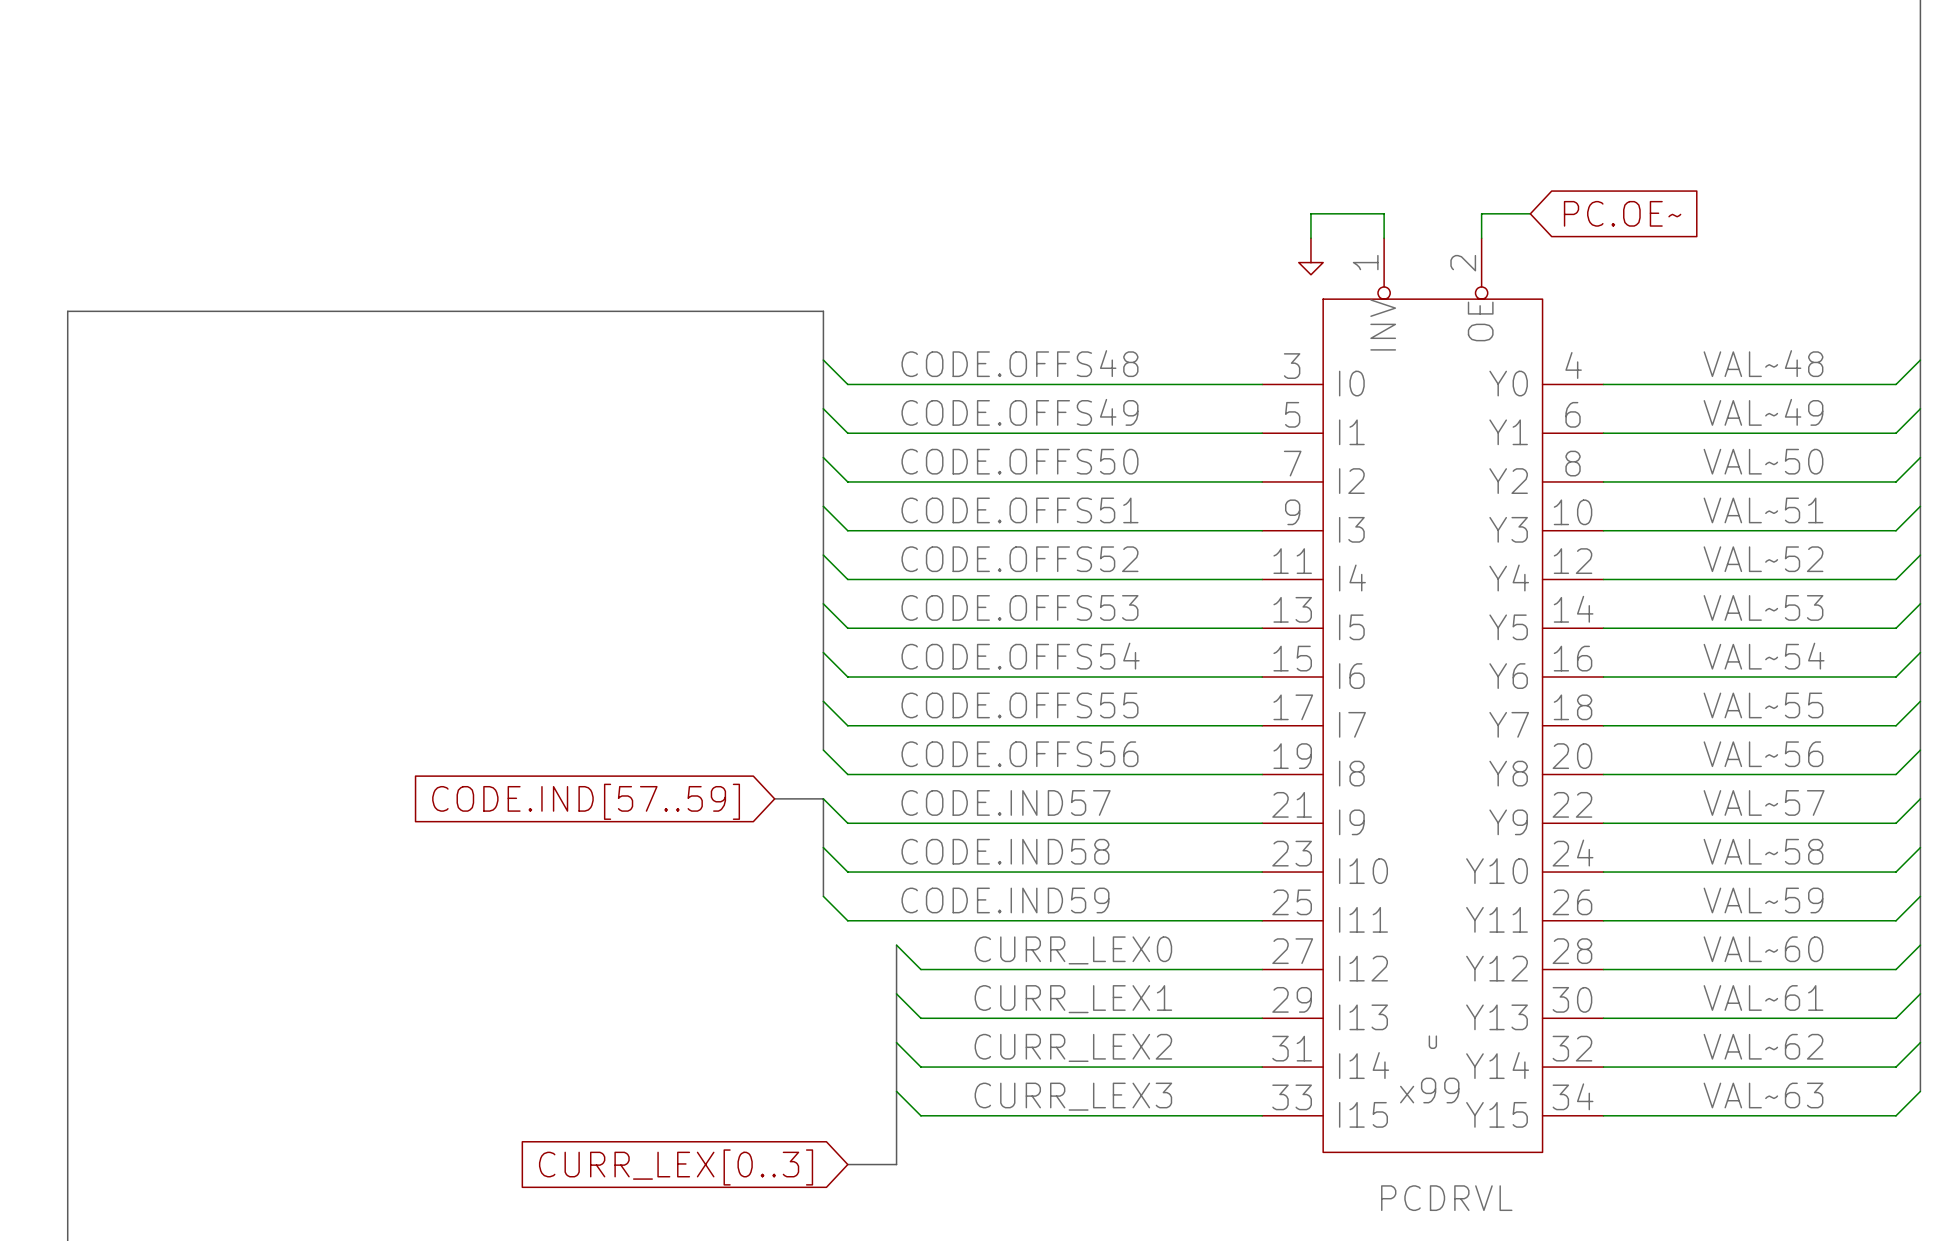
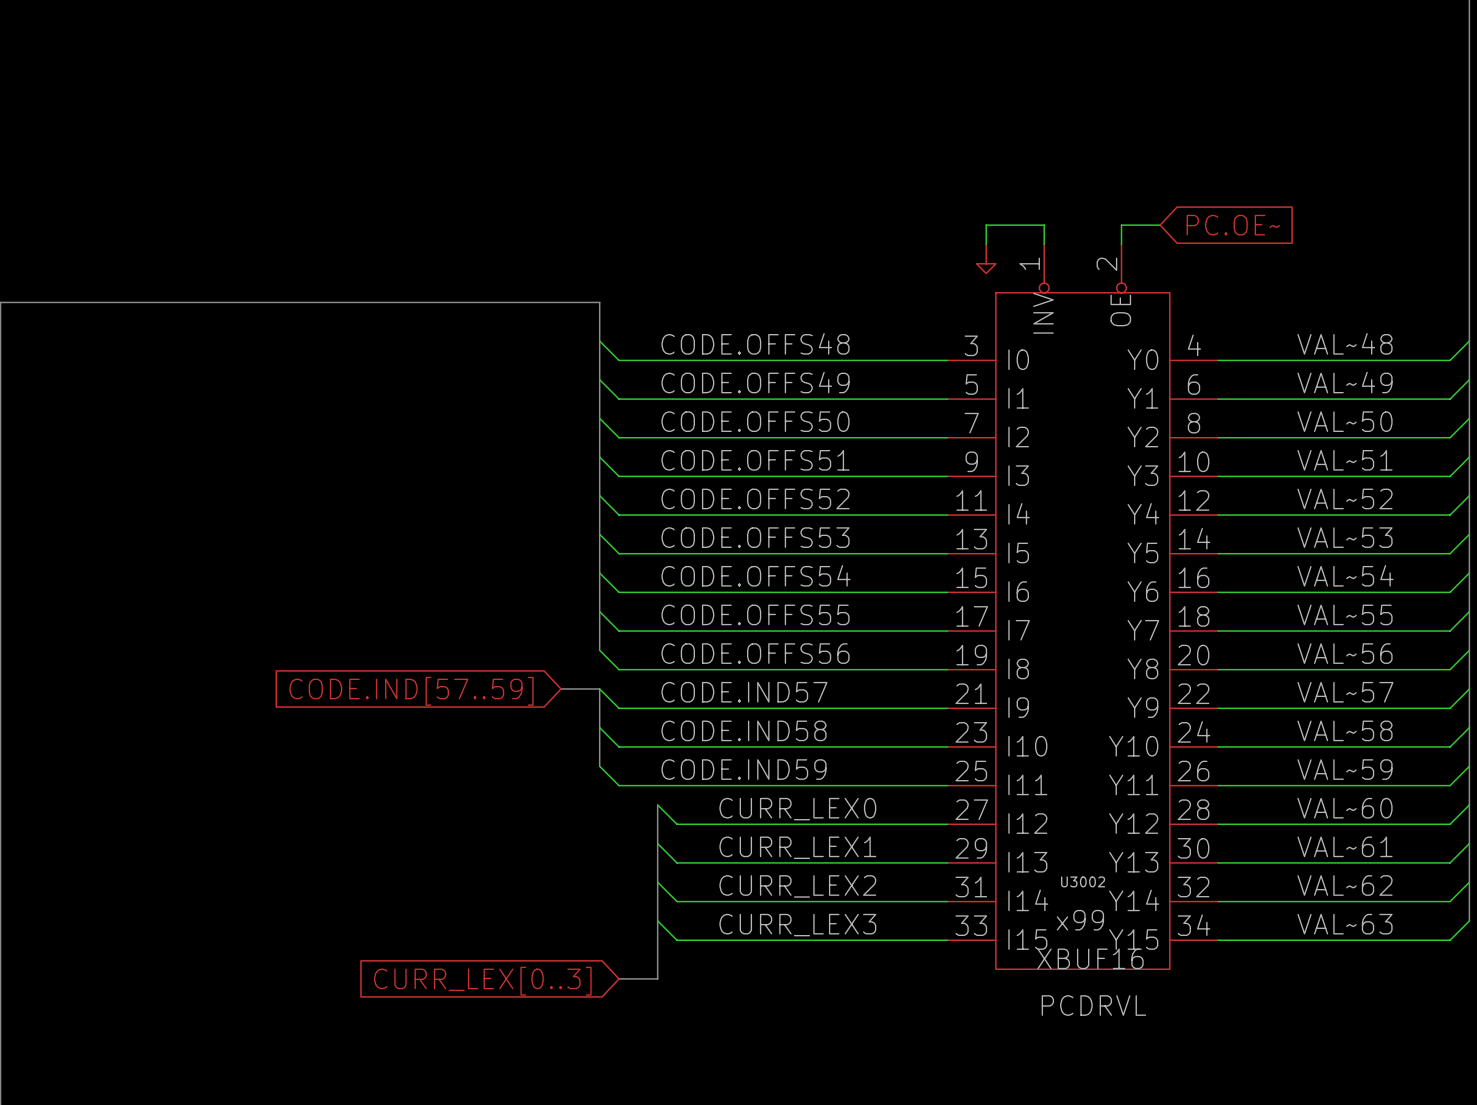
U name: U (1432, 1042) -> U3002 (1083, 881)
U value: none -> XBUF16 (1090, 958)

